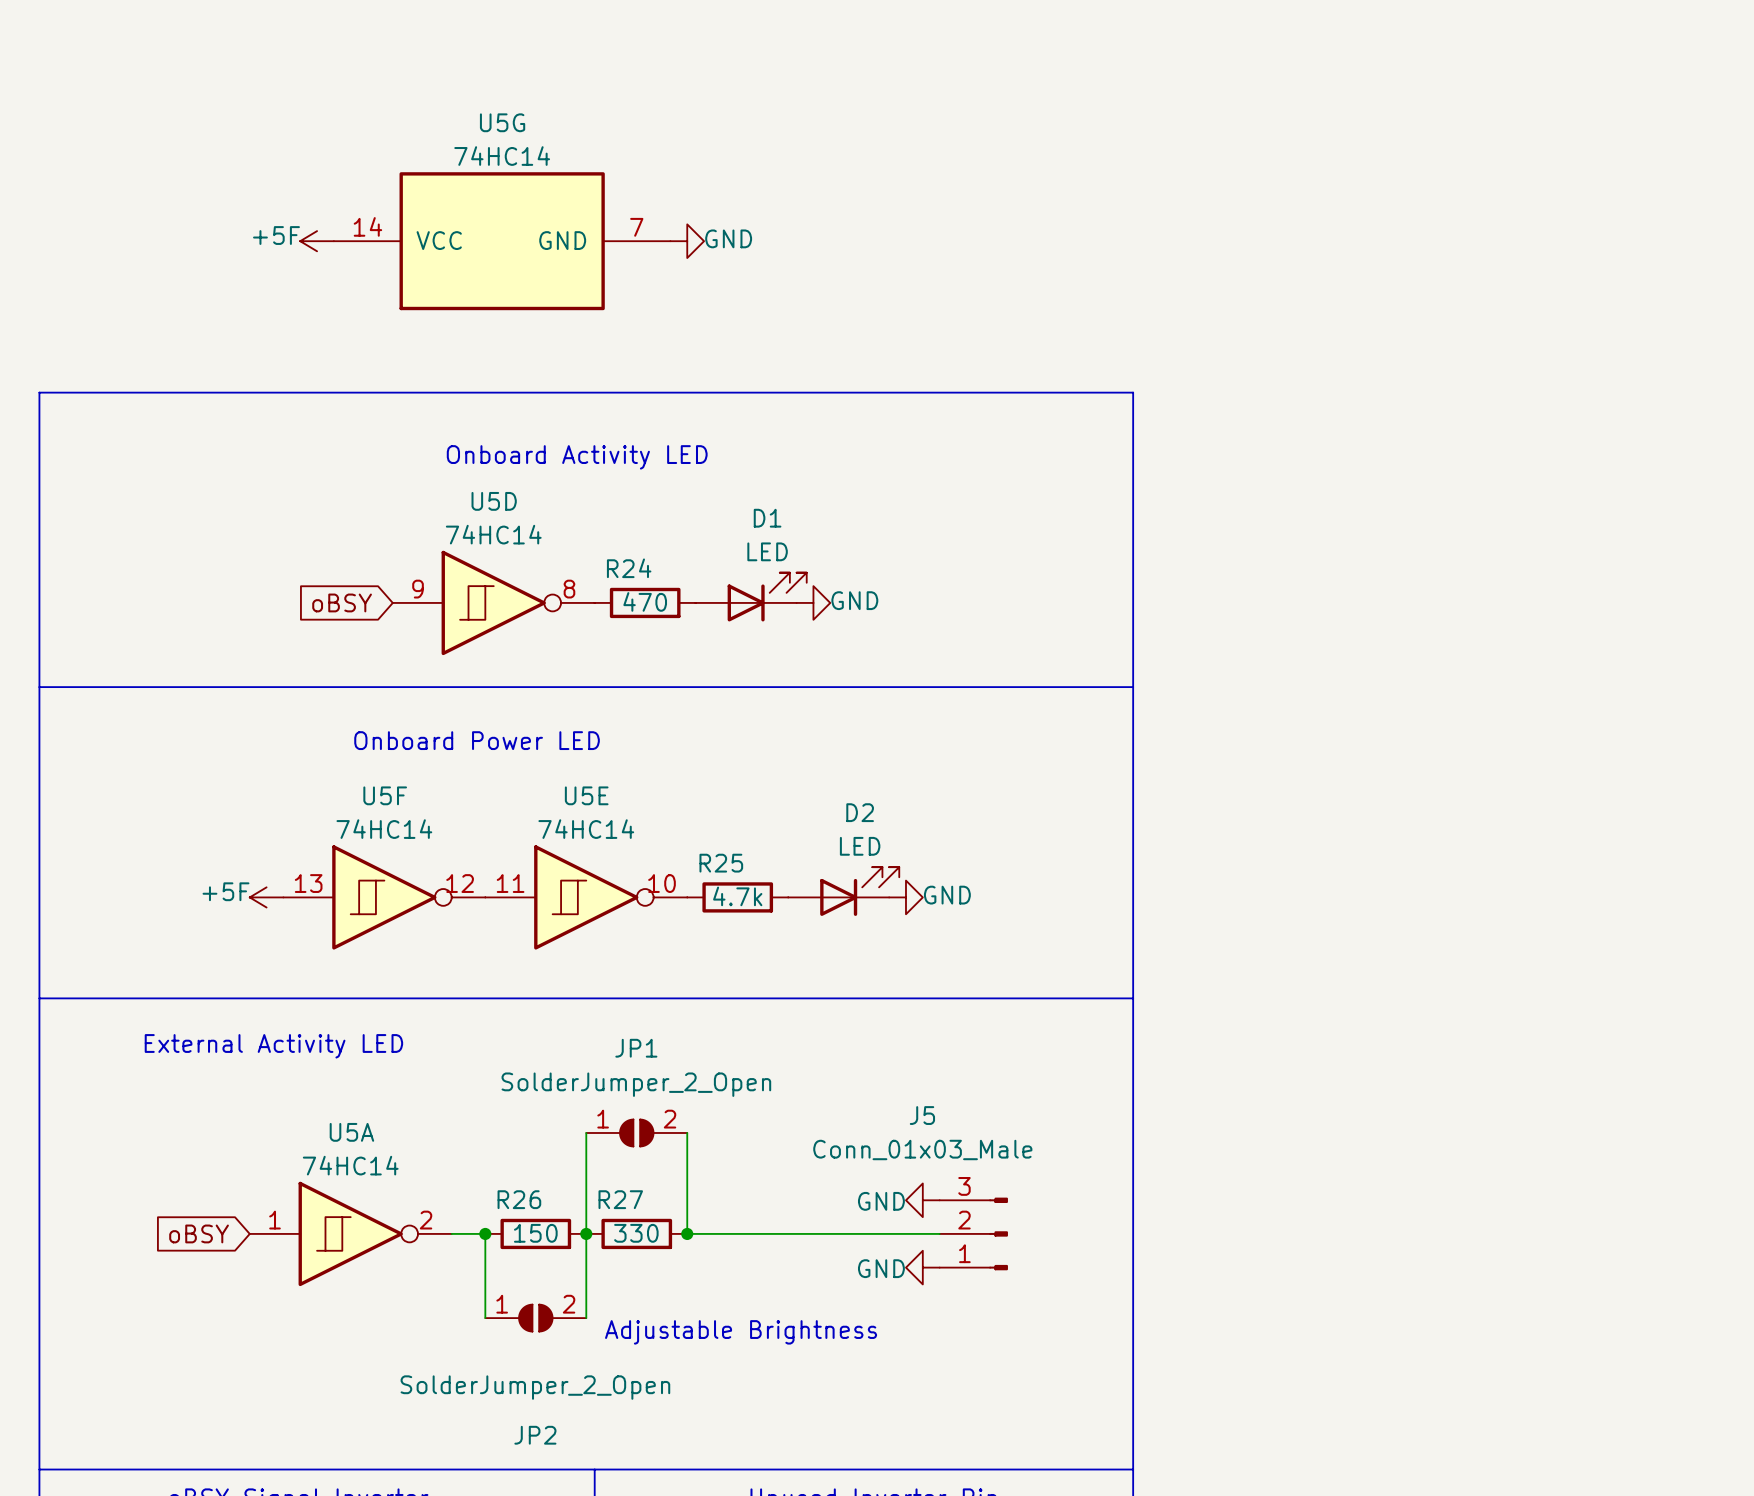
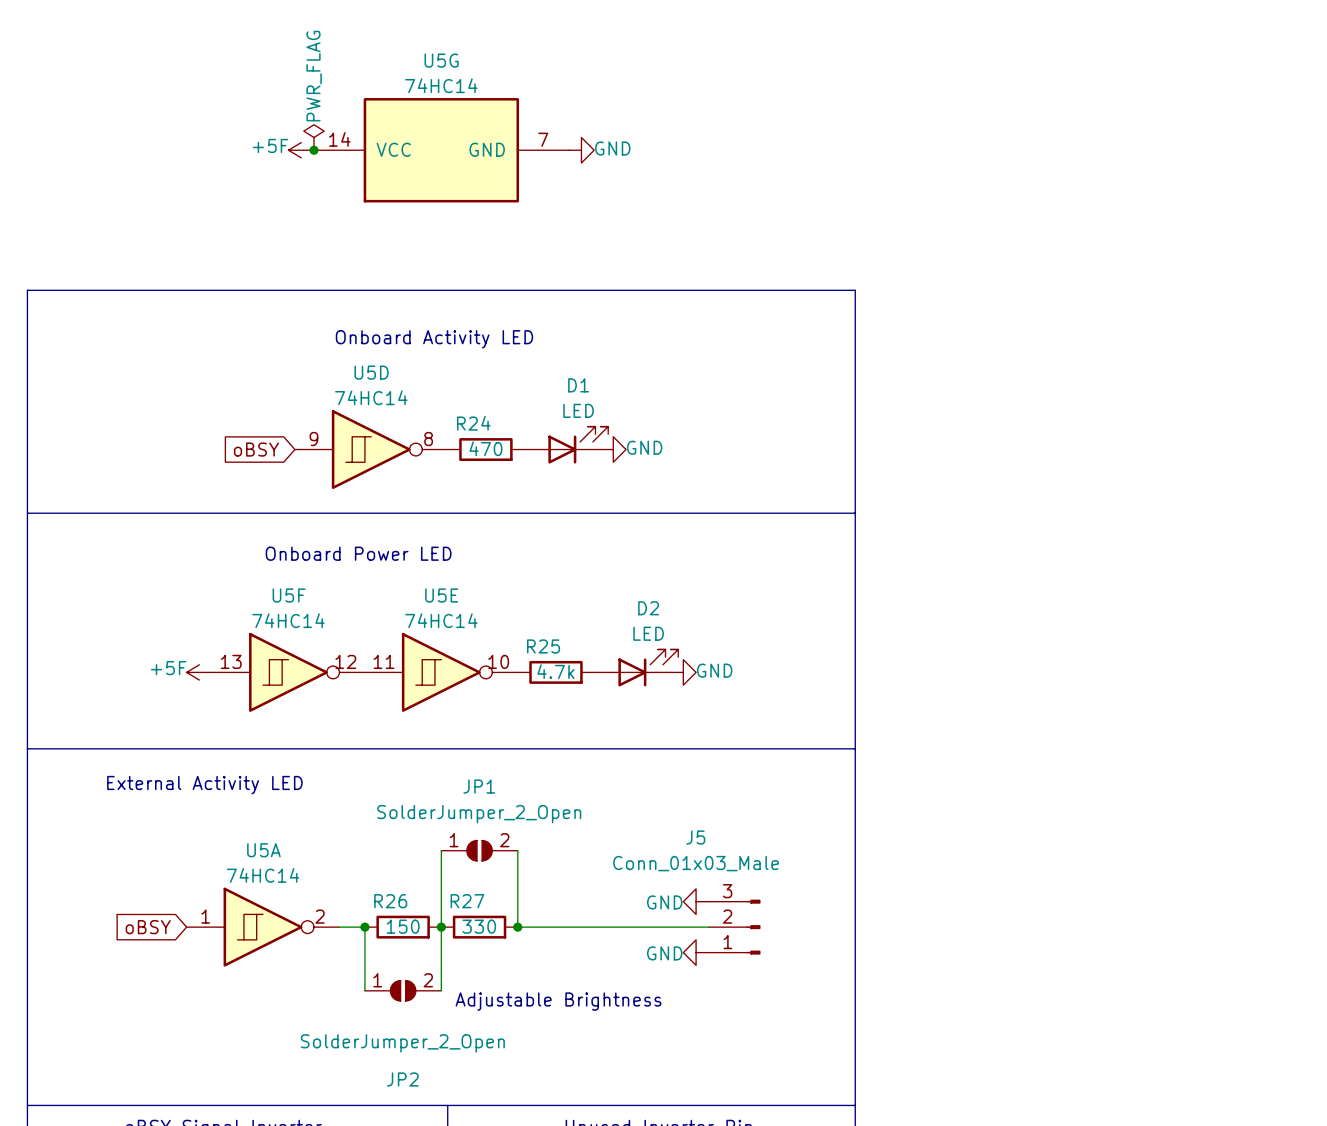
power symbol: none -> PWR_FLAG (313, 137)
junction: none -> (313, 150)
power symbol position: +5F (317, 241) -> +5F (301, 150)
U5G position: (502, 241) -> (441, 150)
power symbol position: GND (687, 241) -> GND (581, 150)

